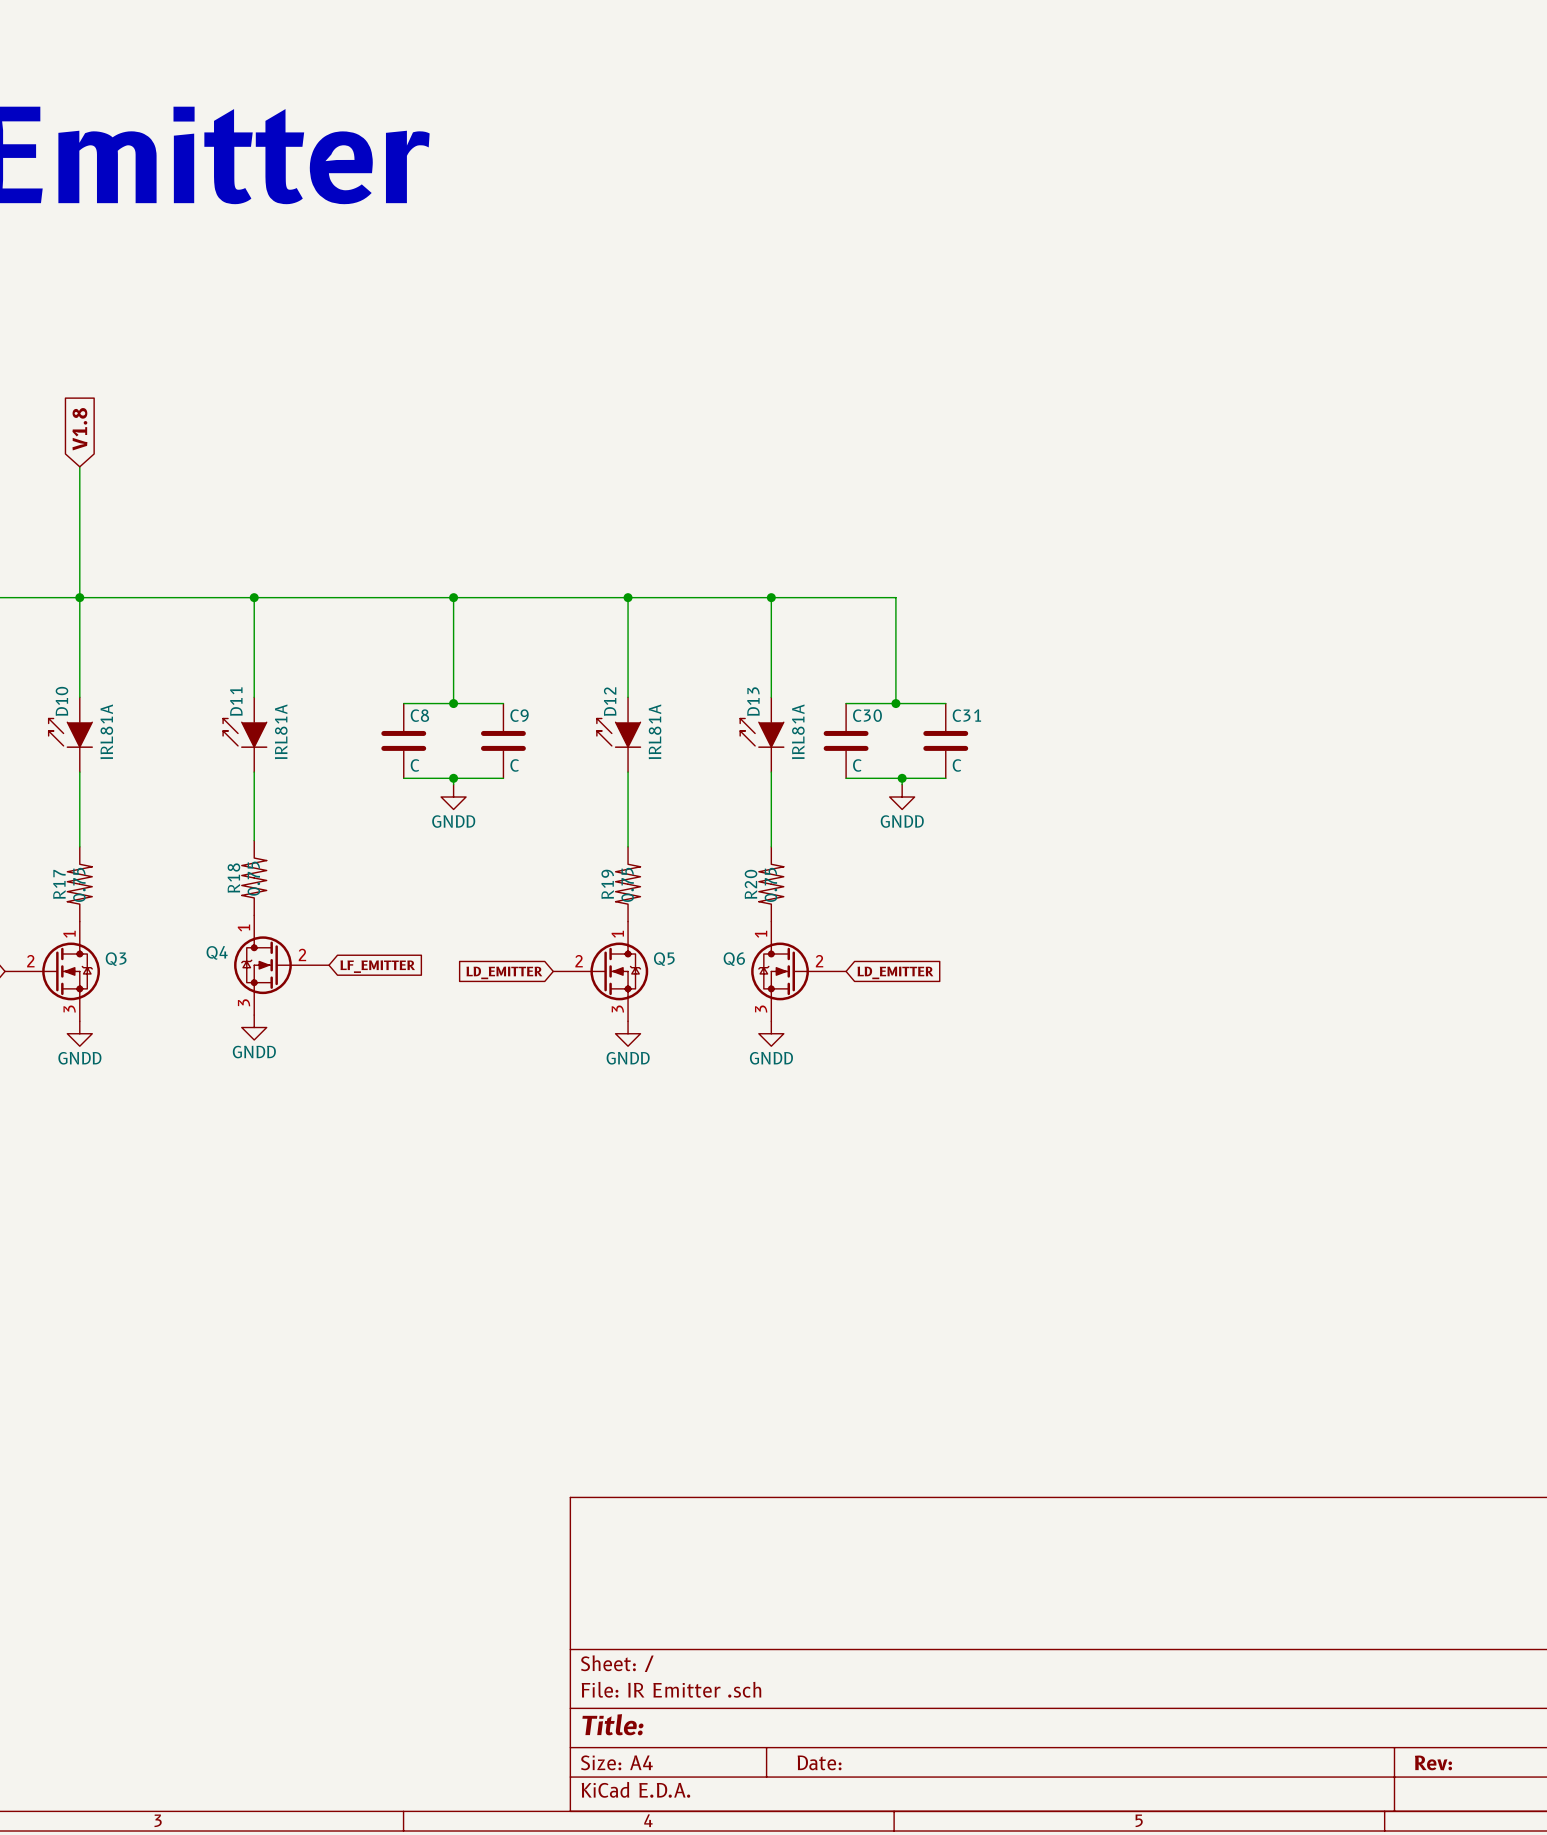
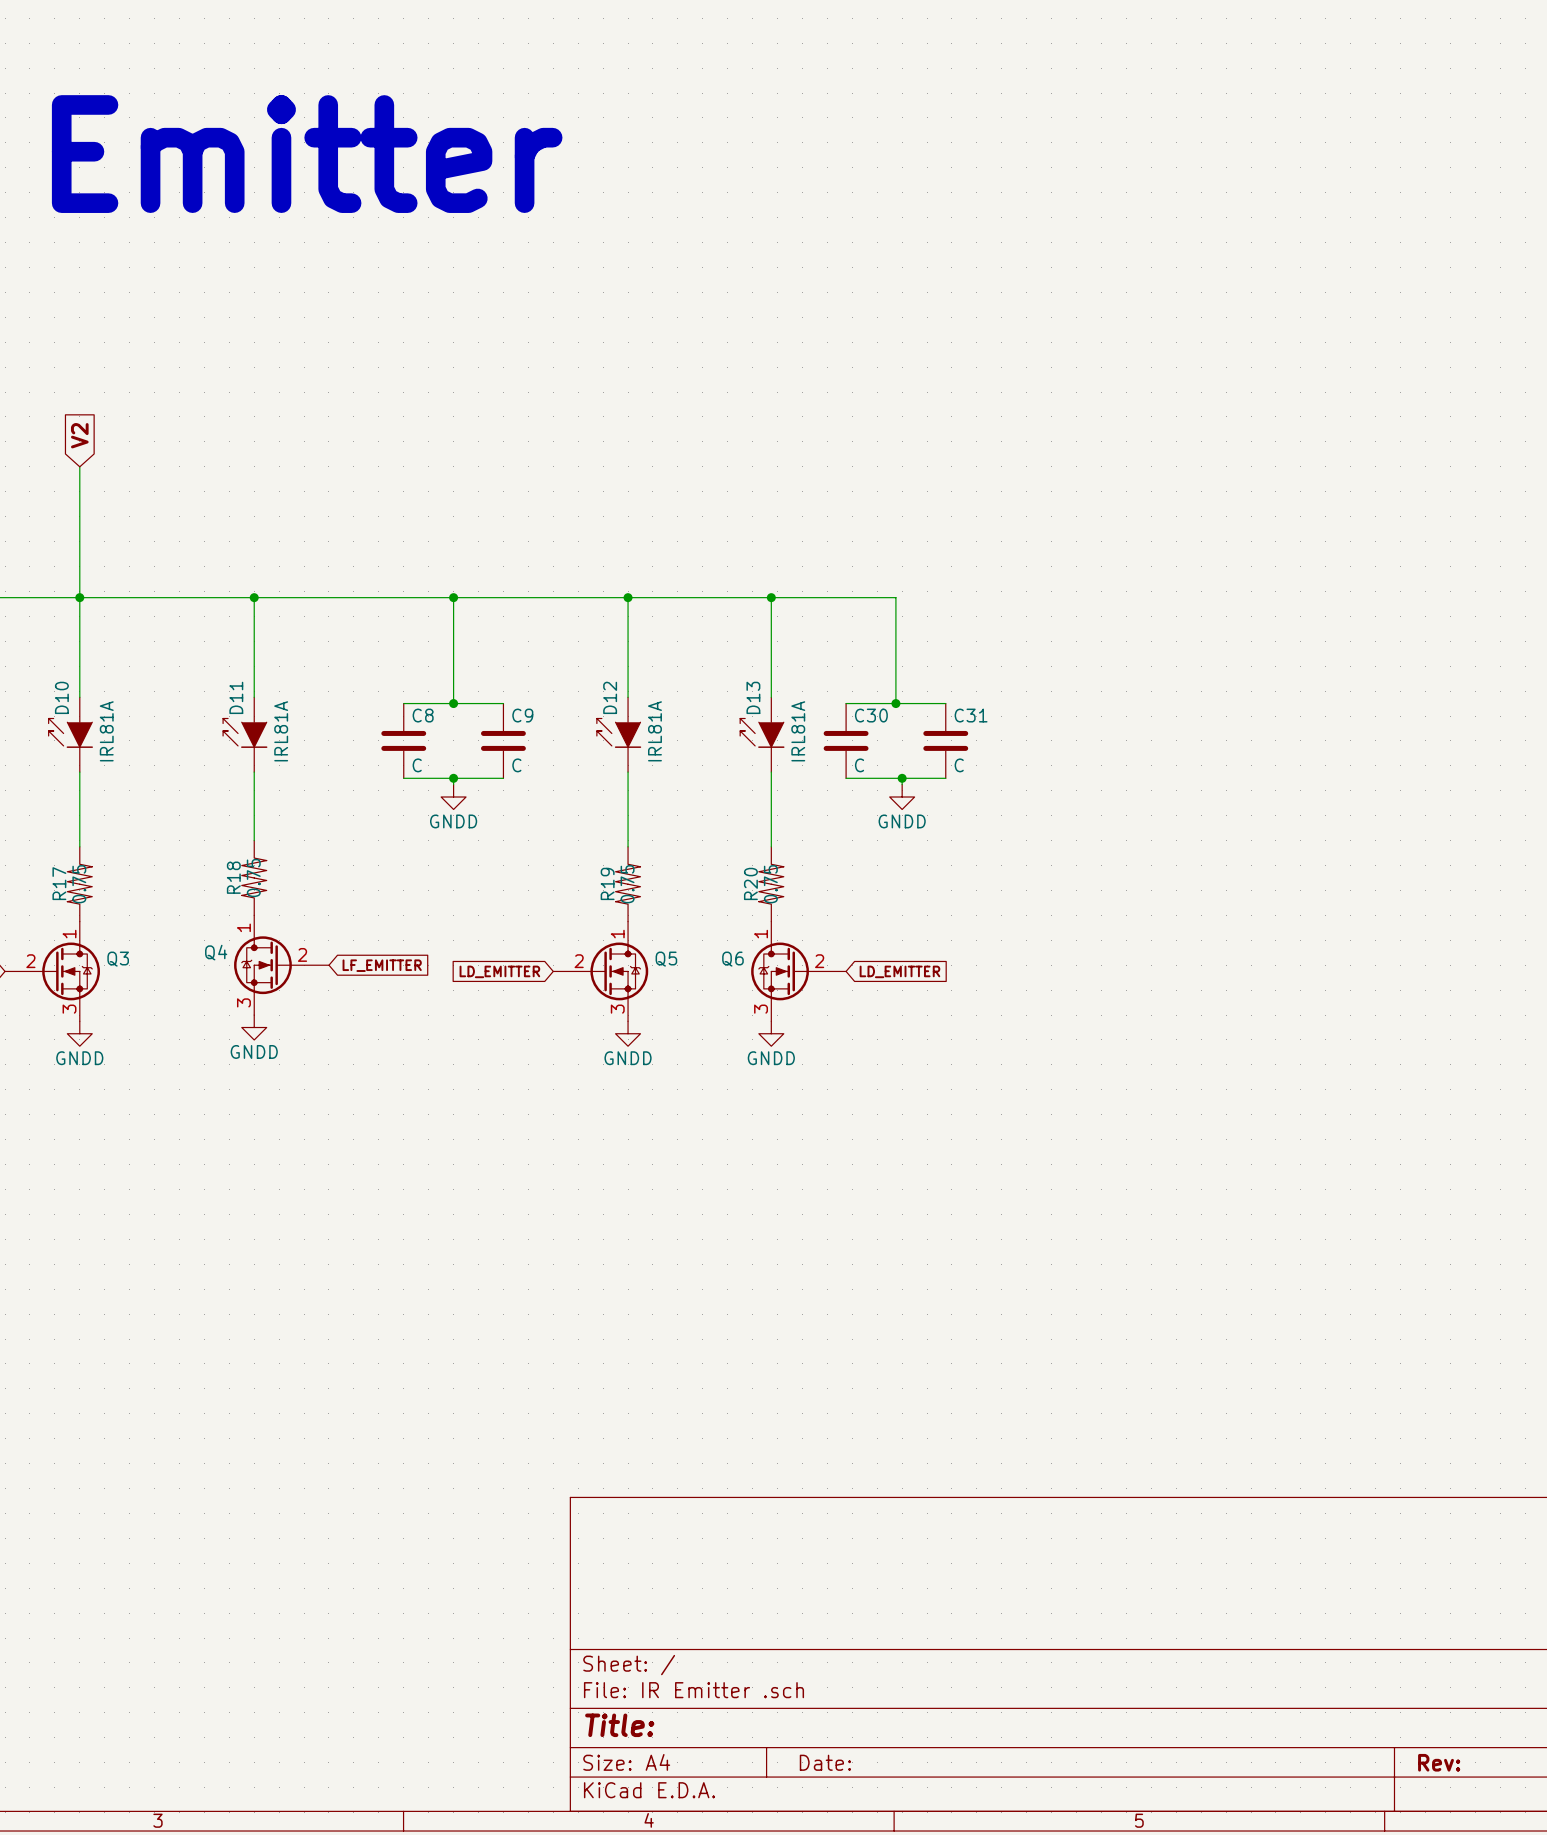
global label: V1.8 (79, 429) -> V2 (79, 435)

